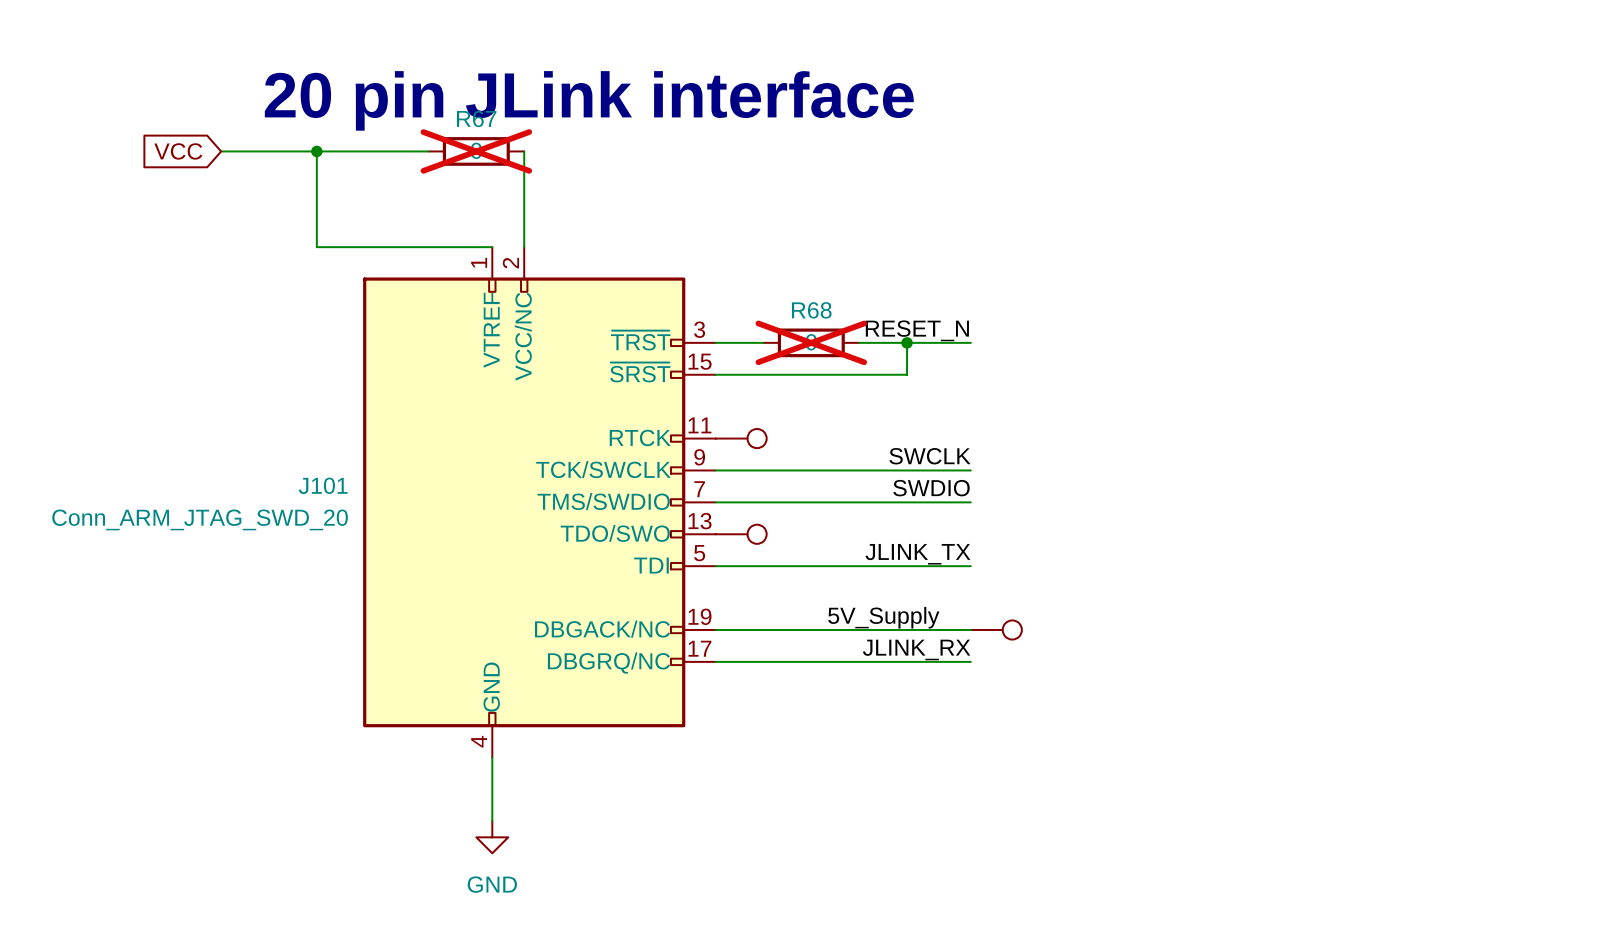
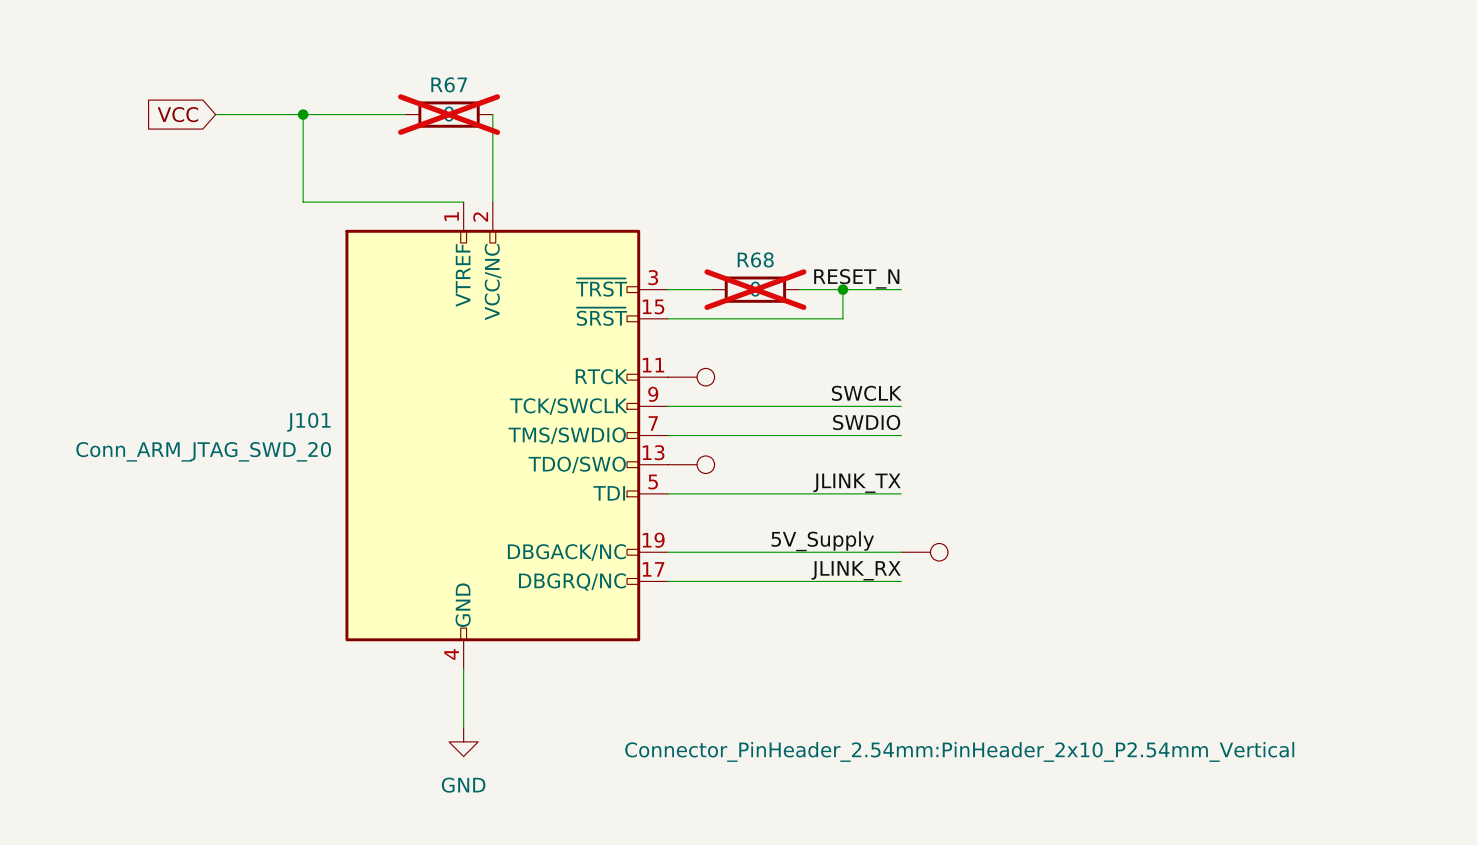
text: 20 pin JLink interface (589, 100) -> none
J101 text: none -> Connector_PinHeader_2.54mm:PinHeader_2x10_P2.54mm_Vertical (959, 751)

